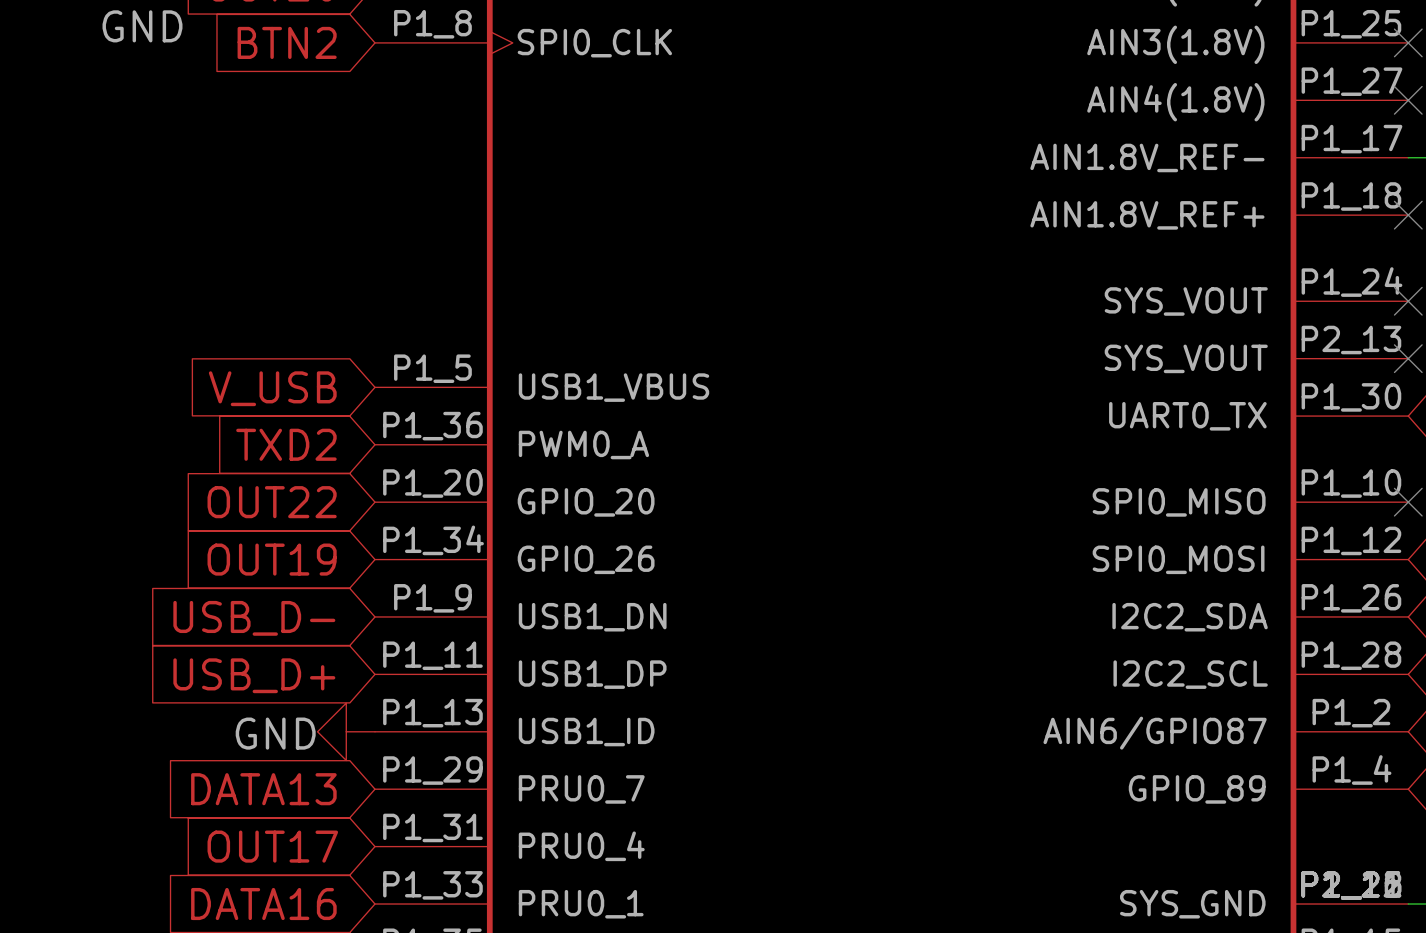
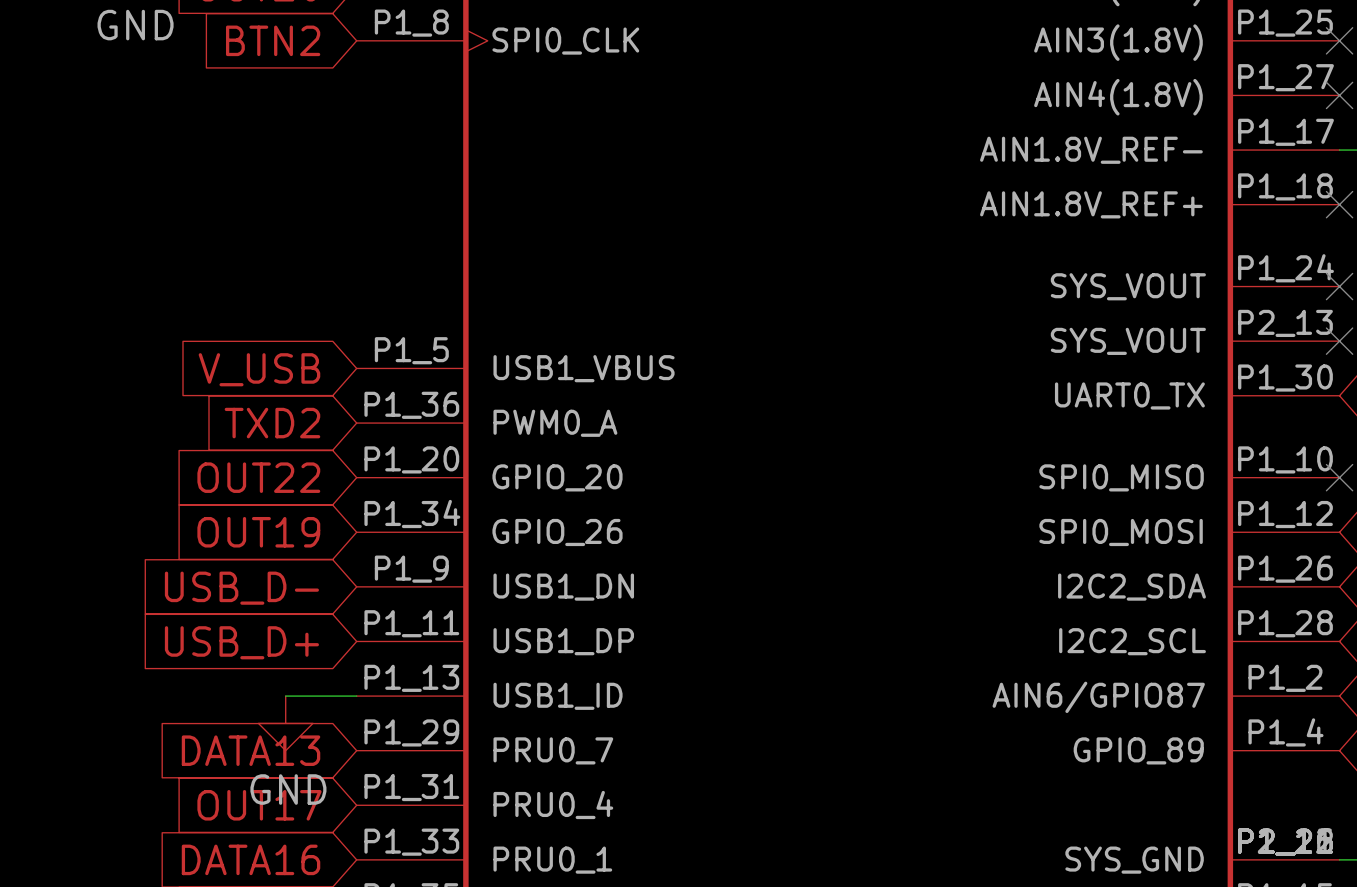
wire: none -> (285, 696) (356, 696)
power symbol rotation: 0° (346, 731) -> 90° counterclockwise (285, 723)
power symbol position: GND (346, 731) -> GND (285, 723)

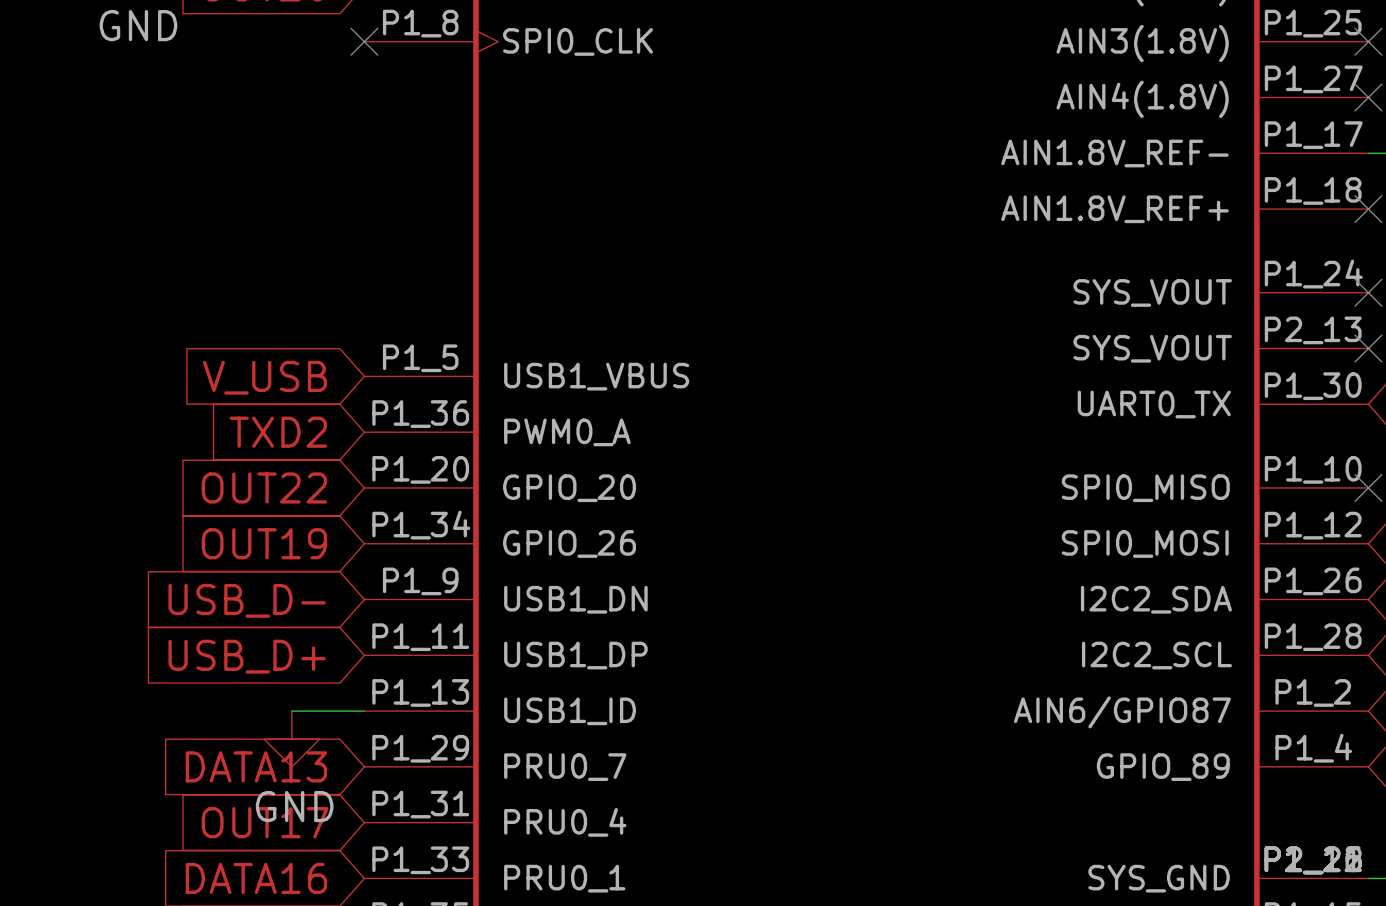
global label: BTN2 (273, 40) -> none
no-connect mark: none -> (364, 41)

